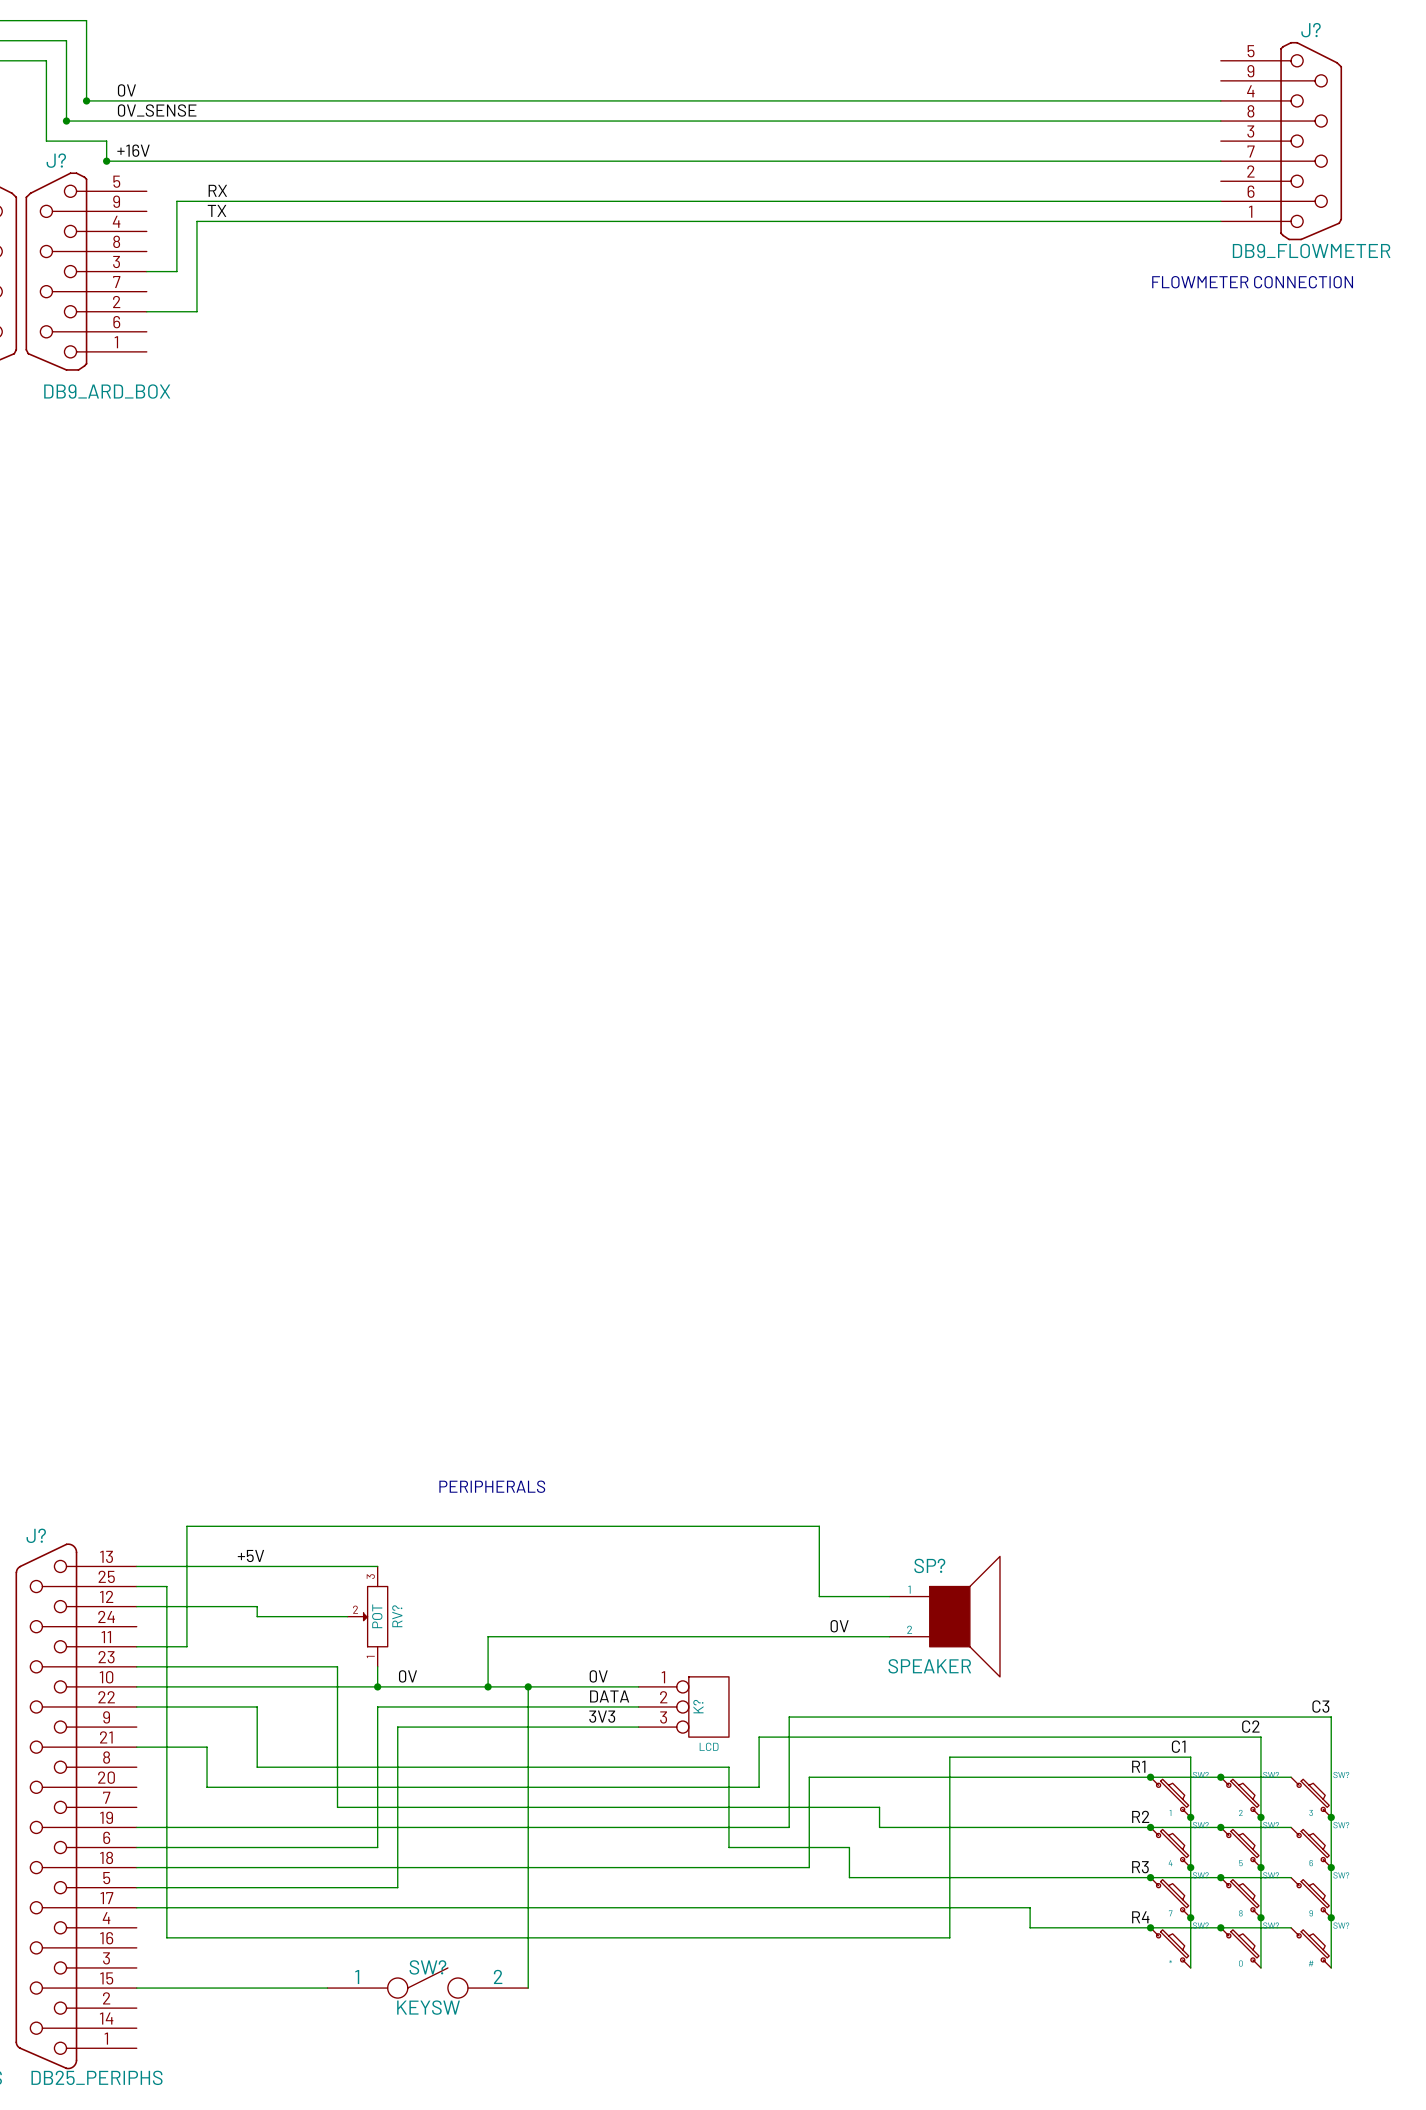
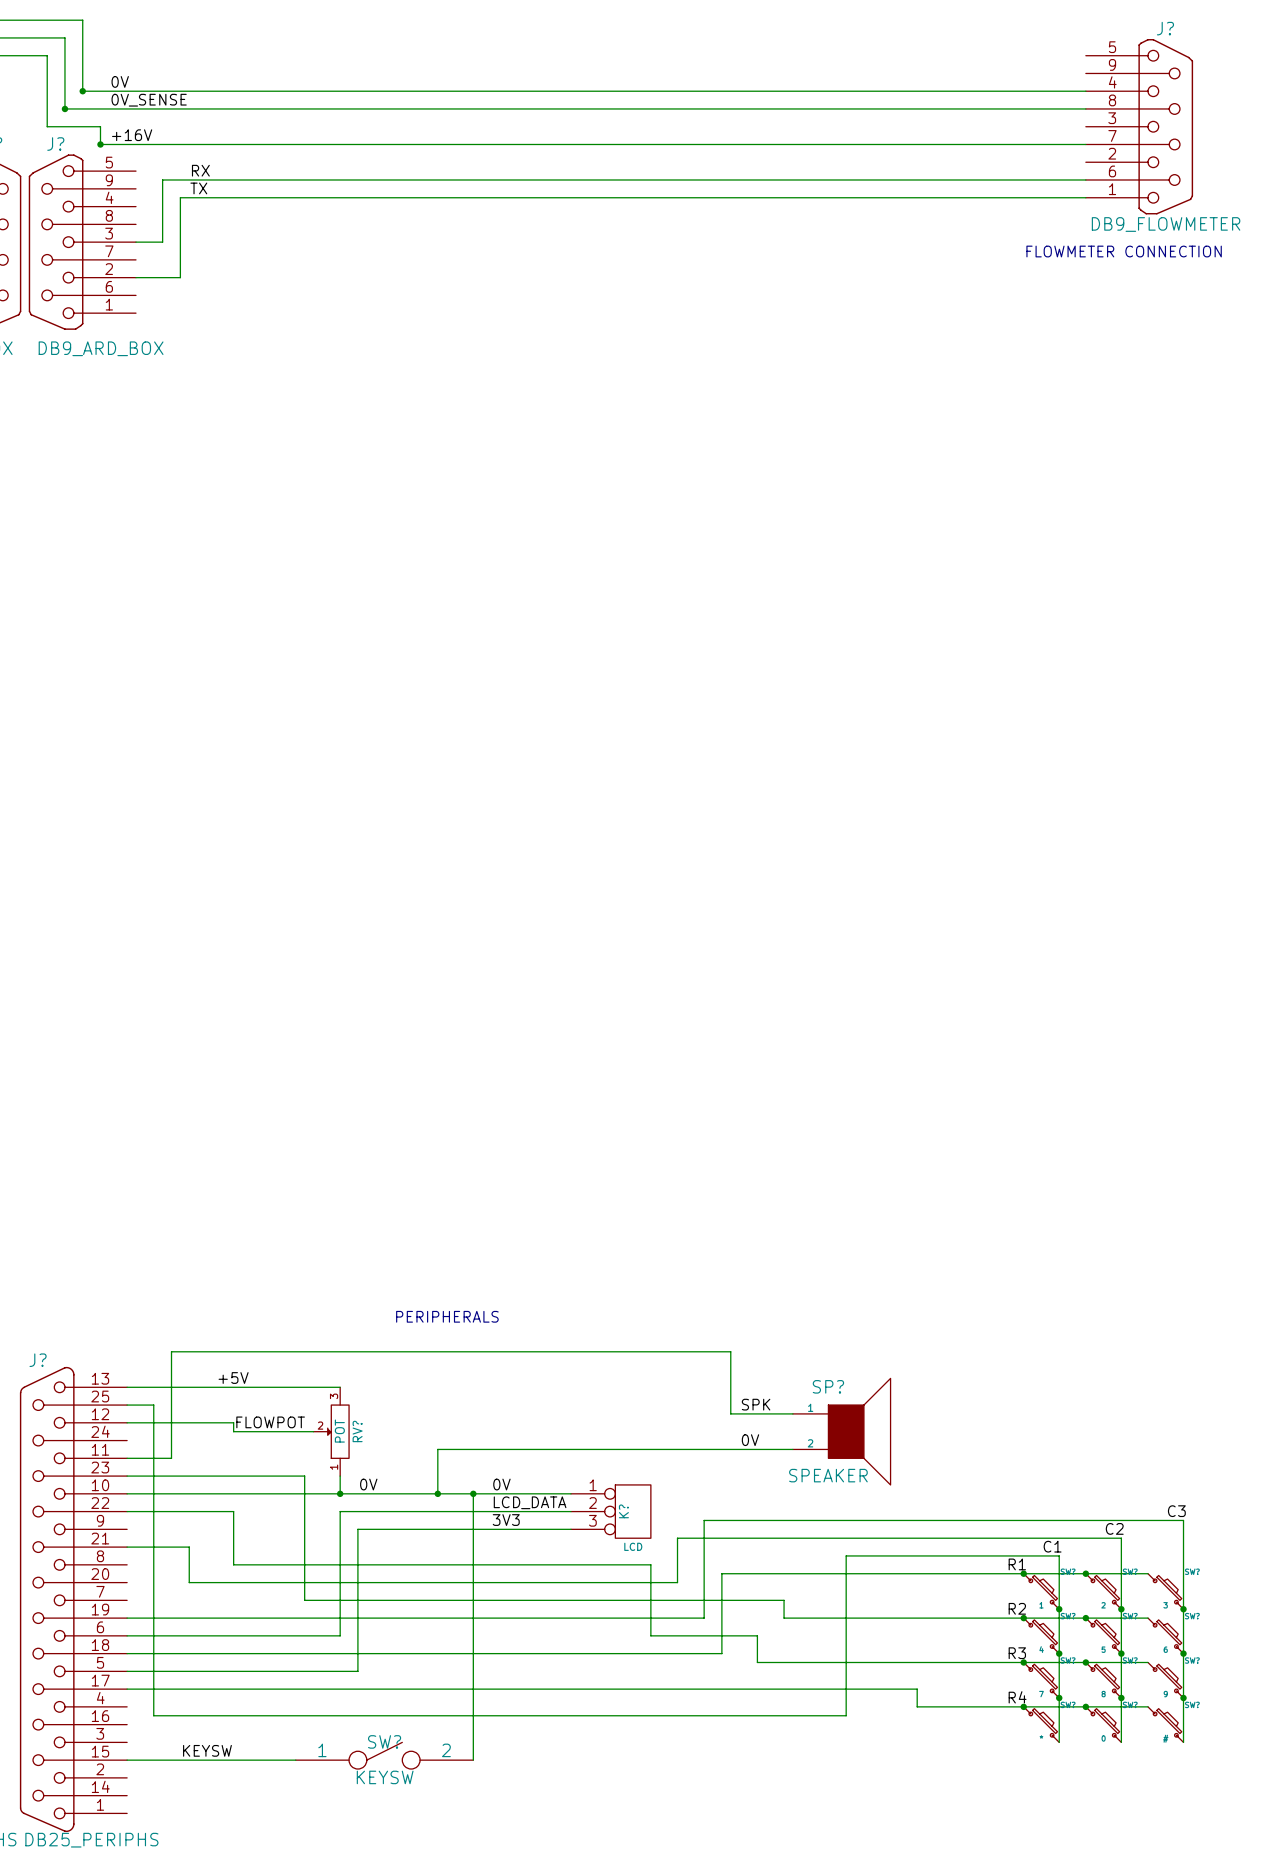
label: none -> SPK (756, 1404)
label: none -> FLOWPOT (270, 1422)
label position: 0V (598, 1676) -> 0V (501, 1484)
label: DATA (609, 1696) -> LCD_DATA (530, 1502)
label position: 3V3 (602, 1716) -> 3V3 (506, 1520)
label: none -> KEYSW (207, 1750)

